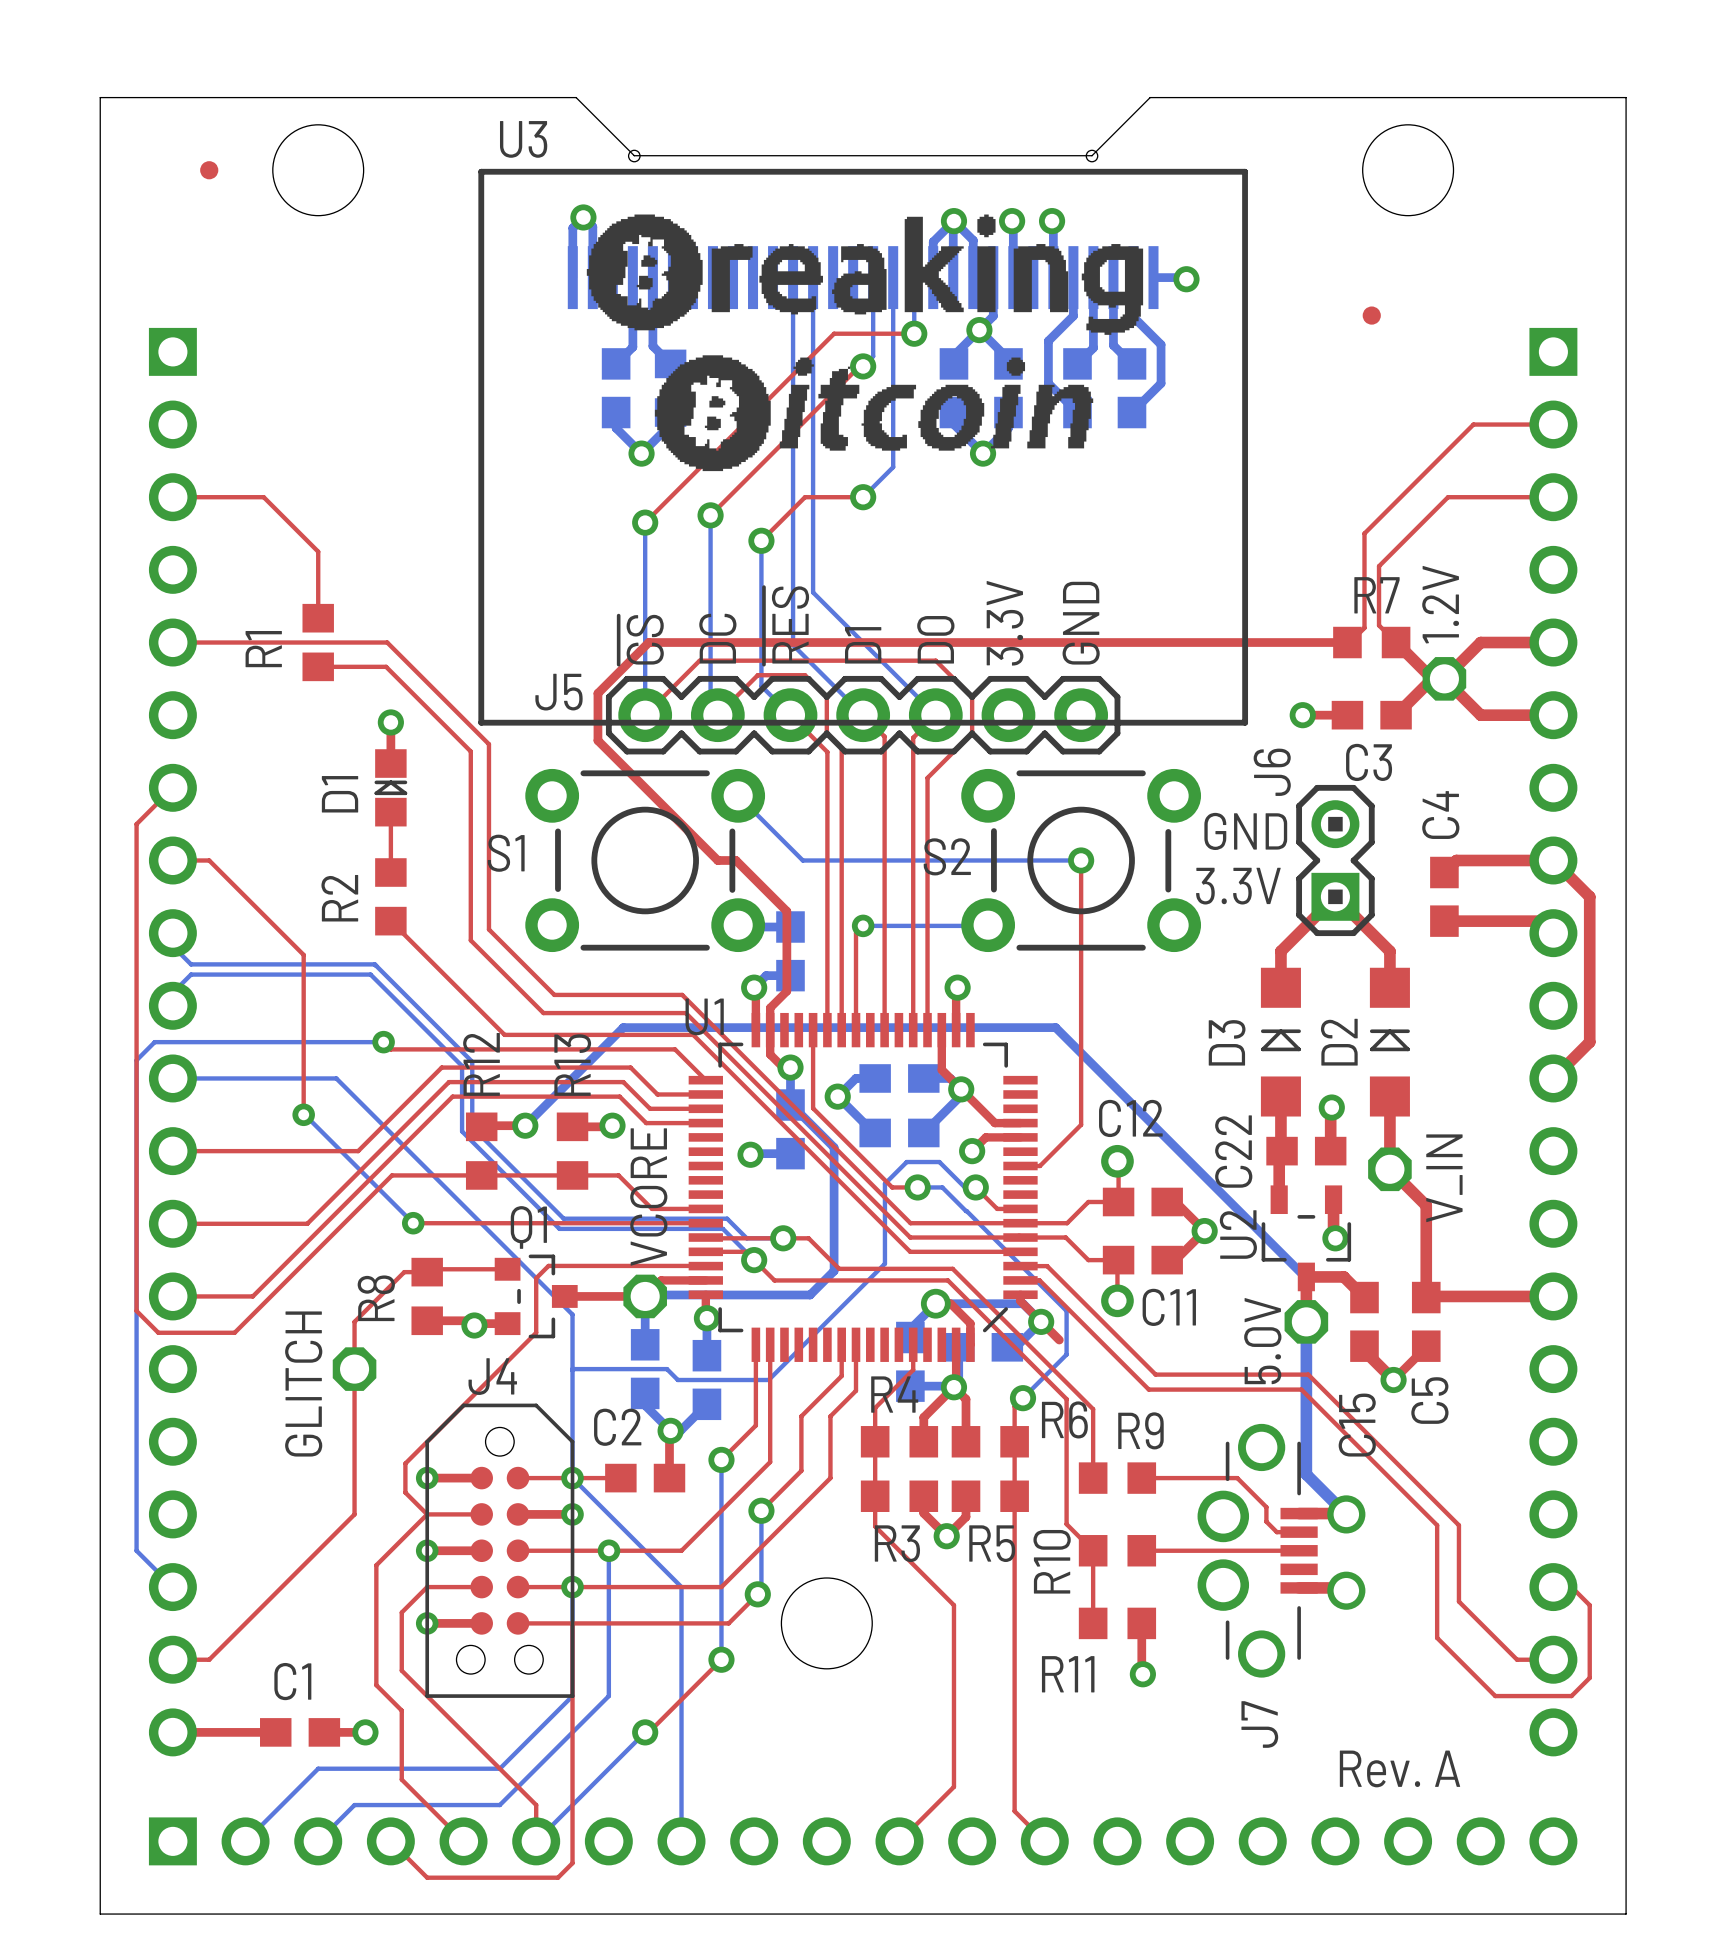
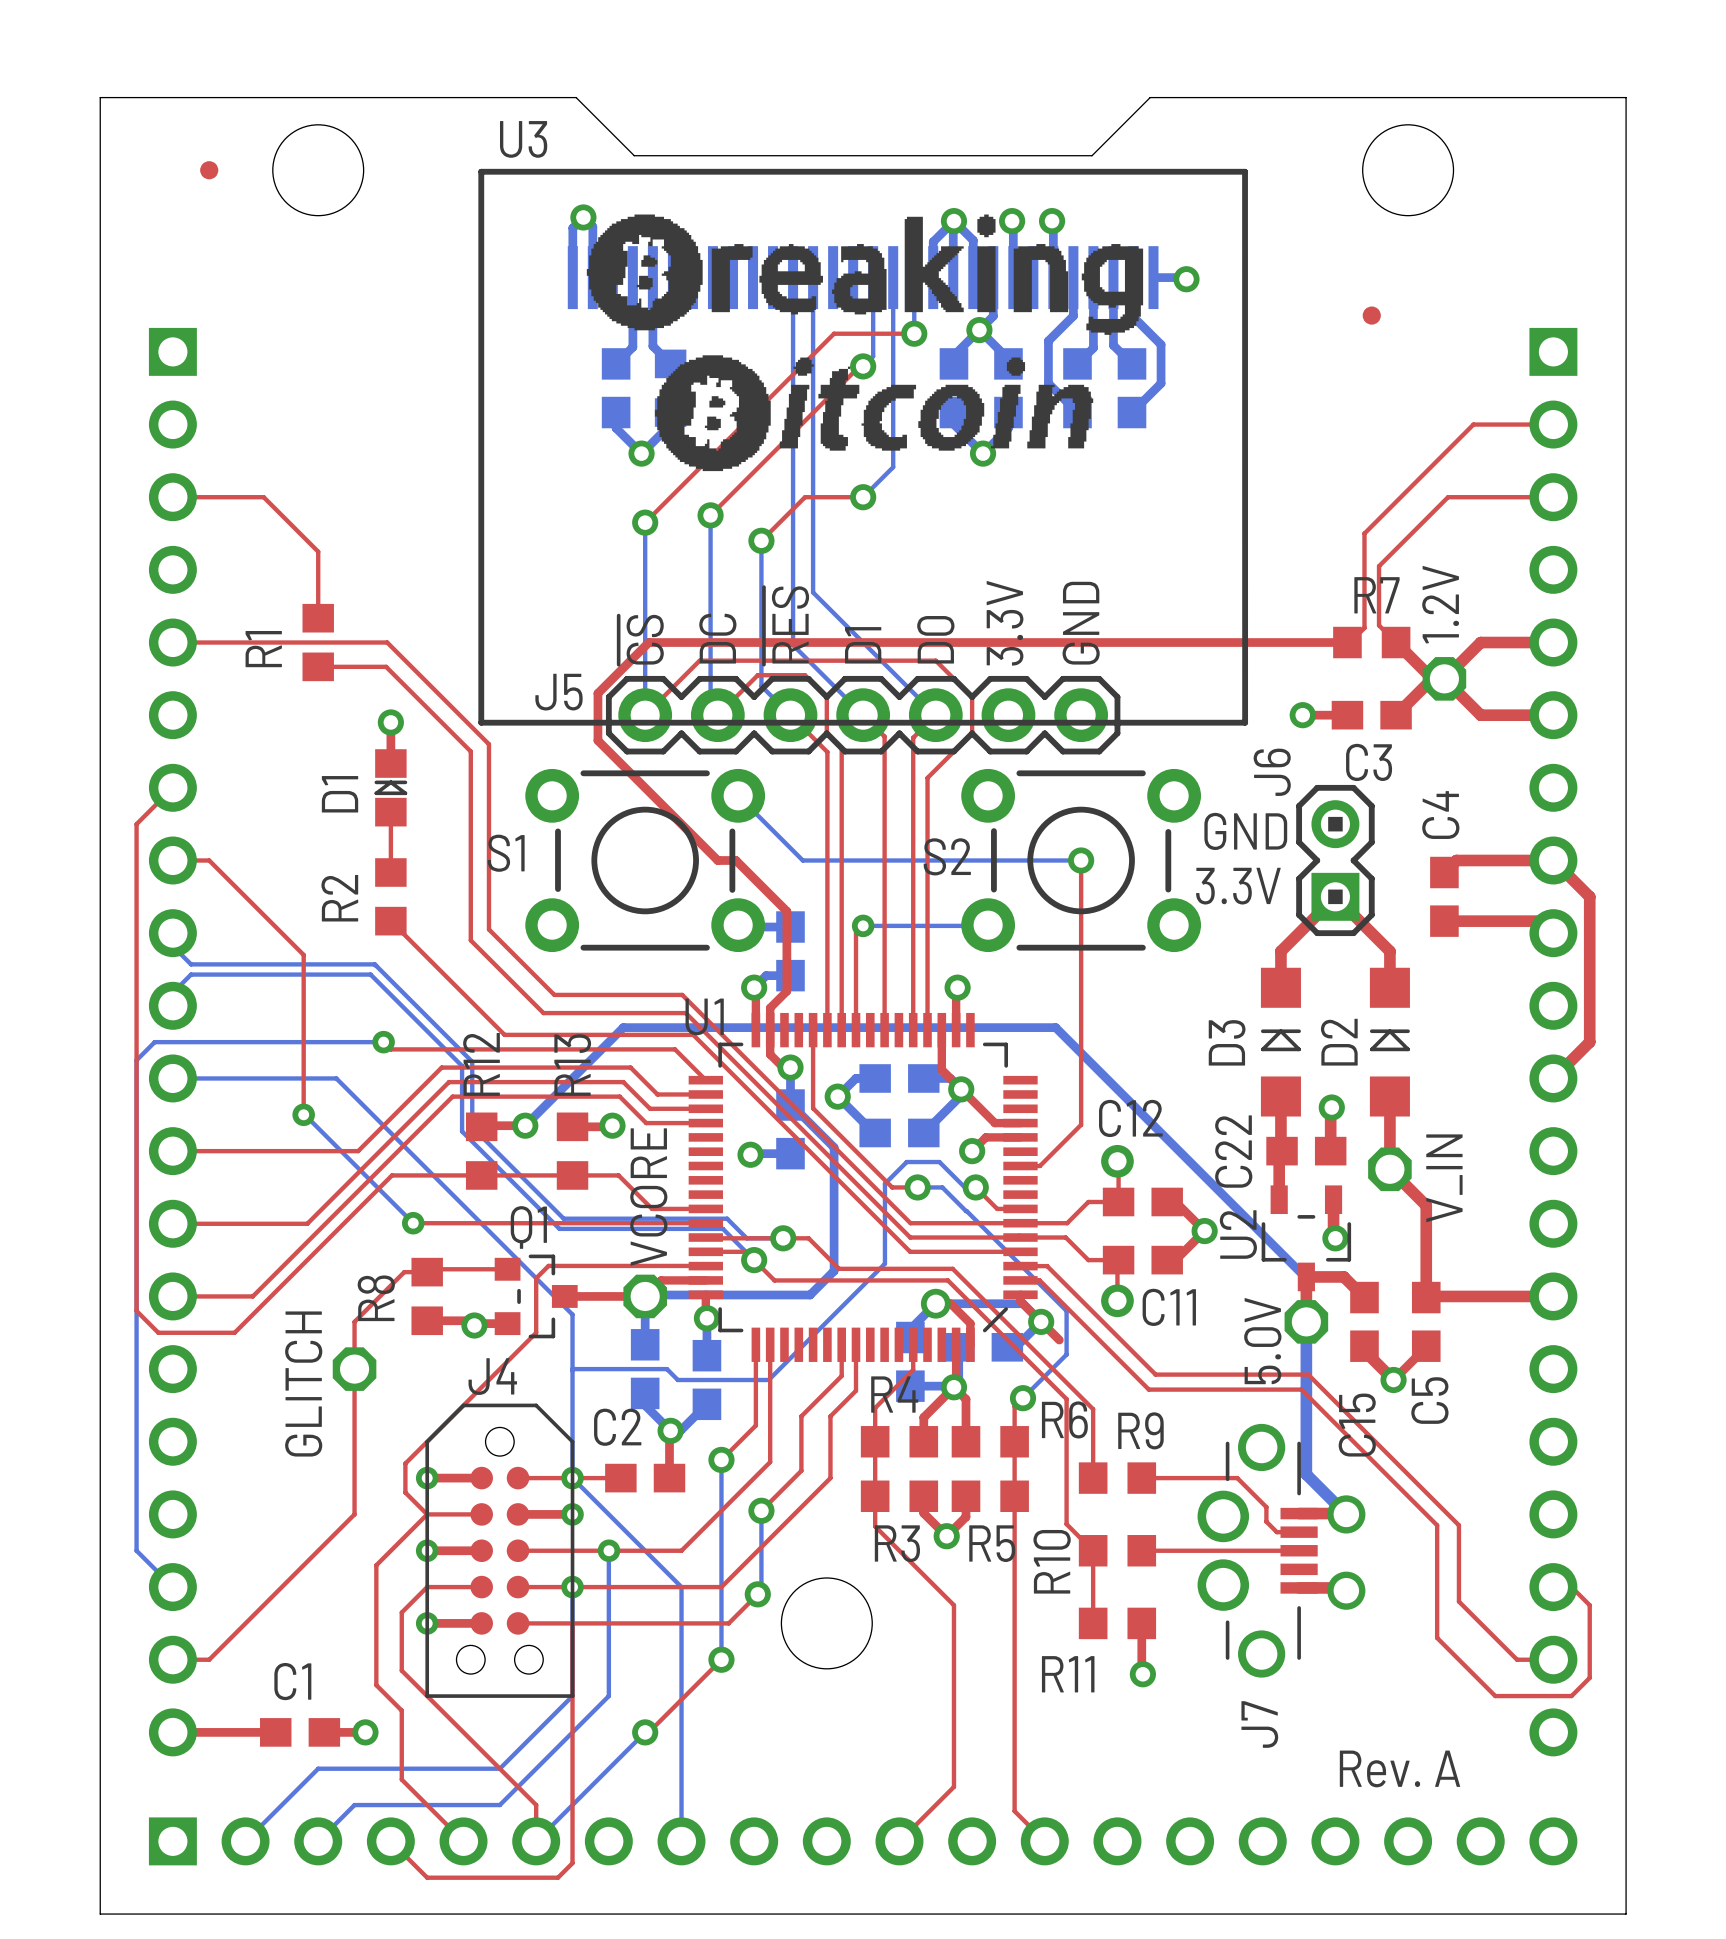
U3 footprint: [478, 150, 1249, 726] -> [478, 168, 1249, 726]

